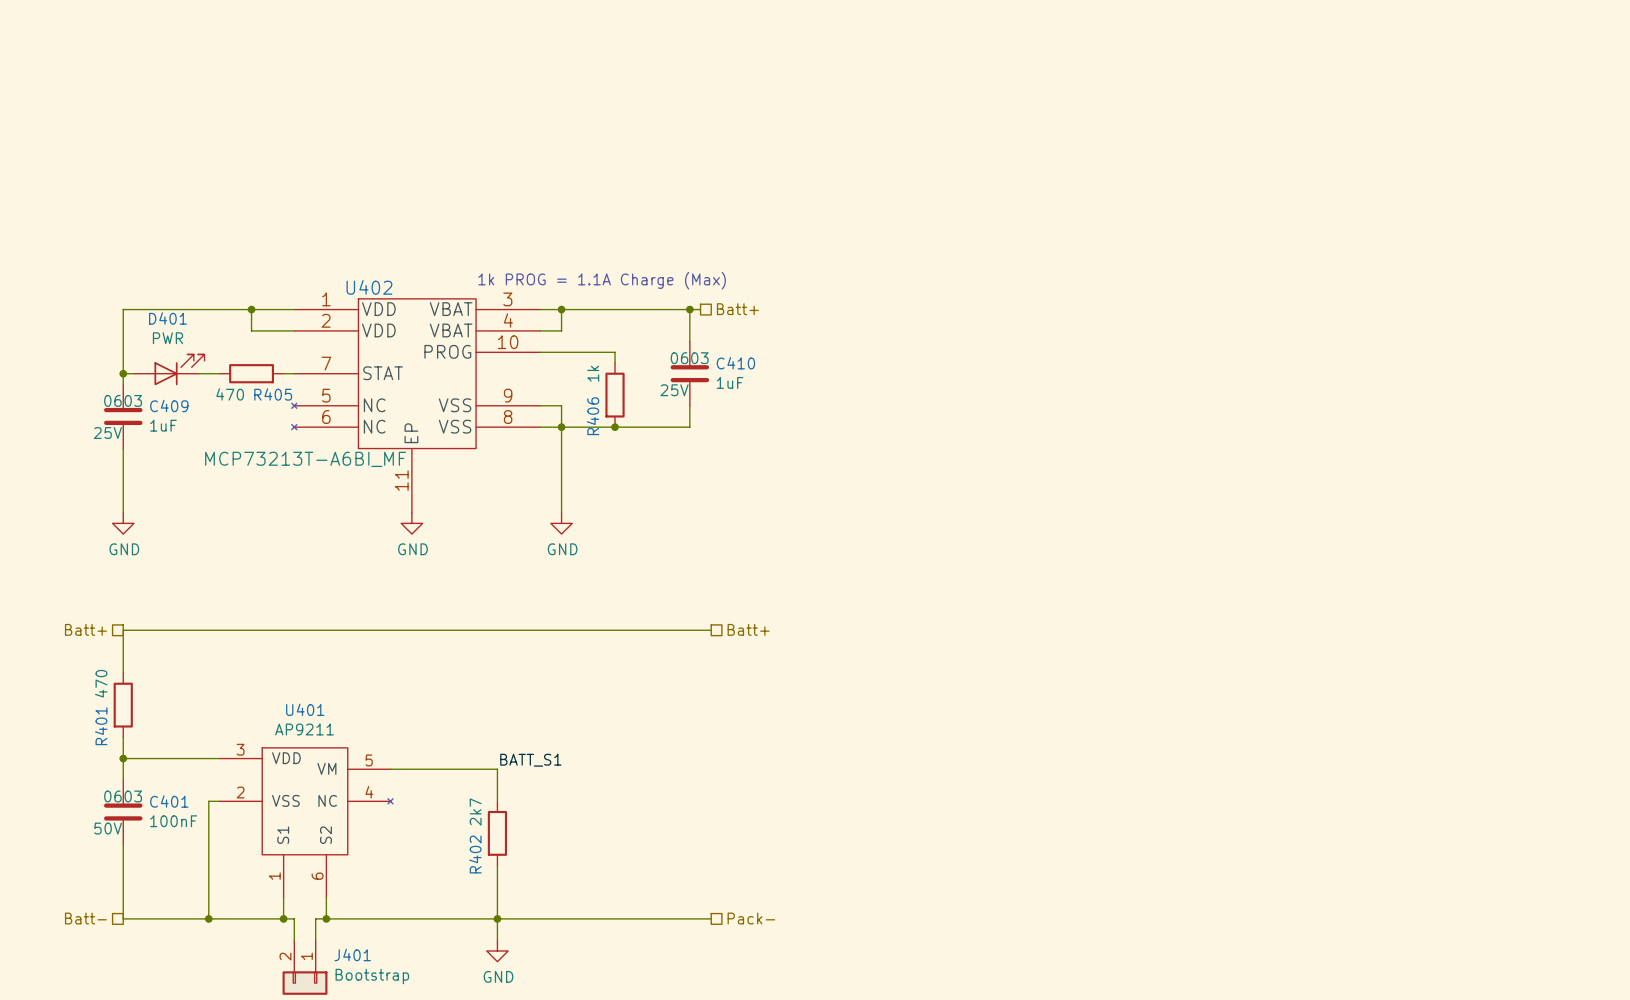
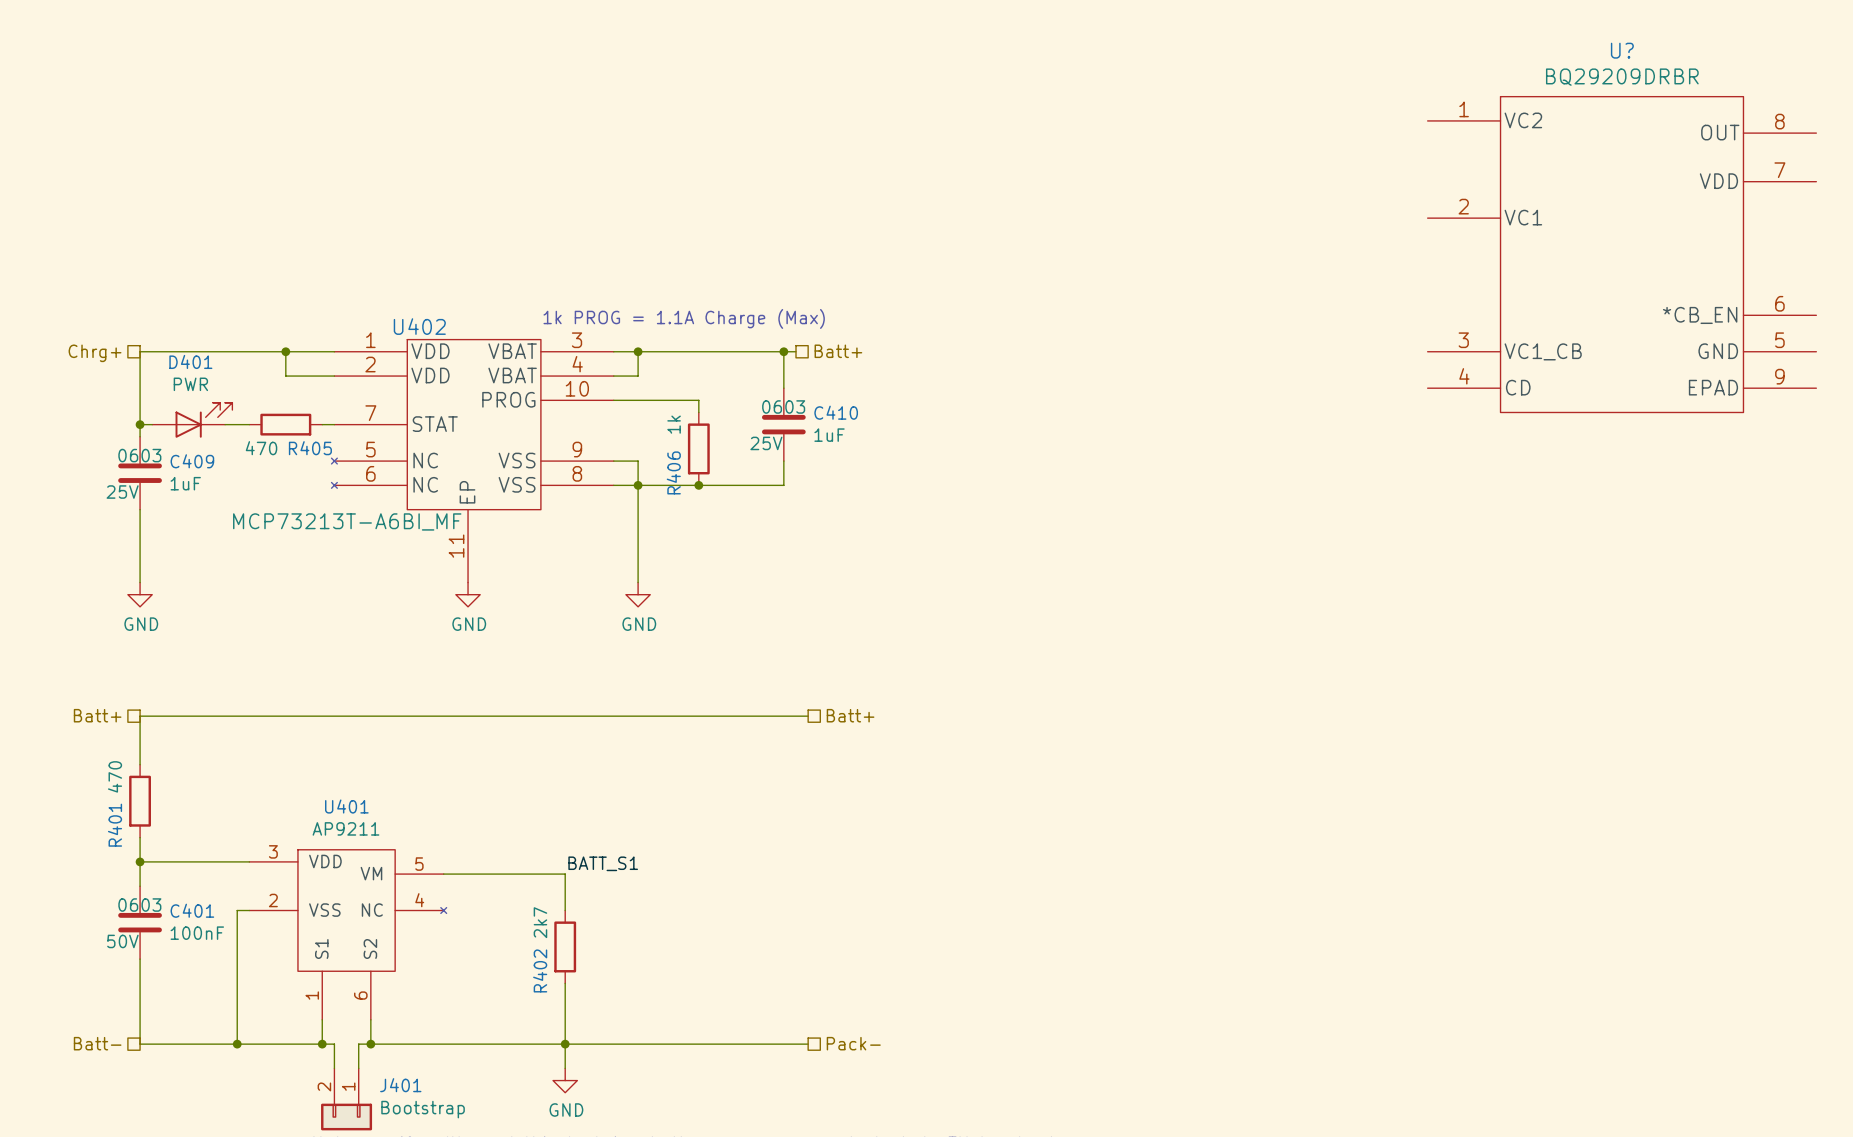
U?: none -> BQ29209DRBR (1622, 254)
hierarchical label: none -> Chrg+ (95, 353)

